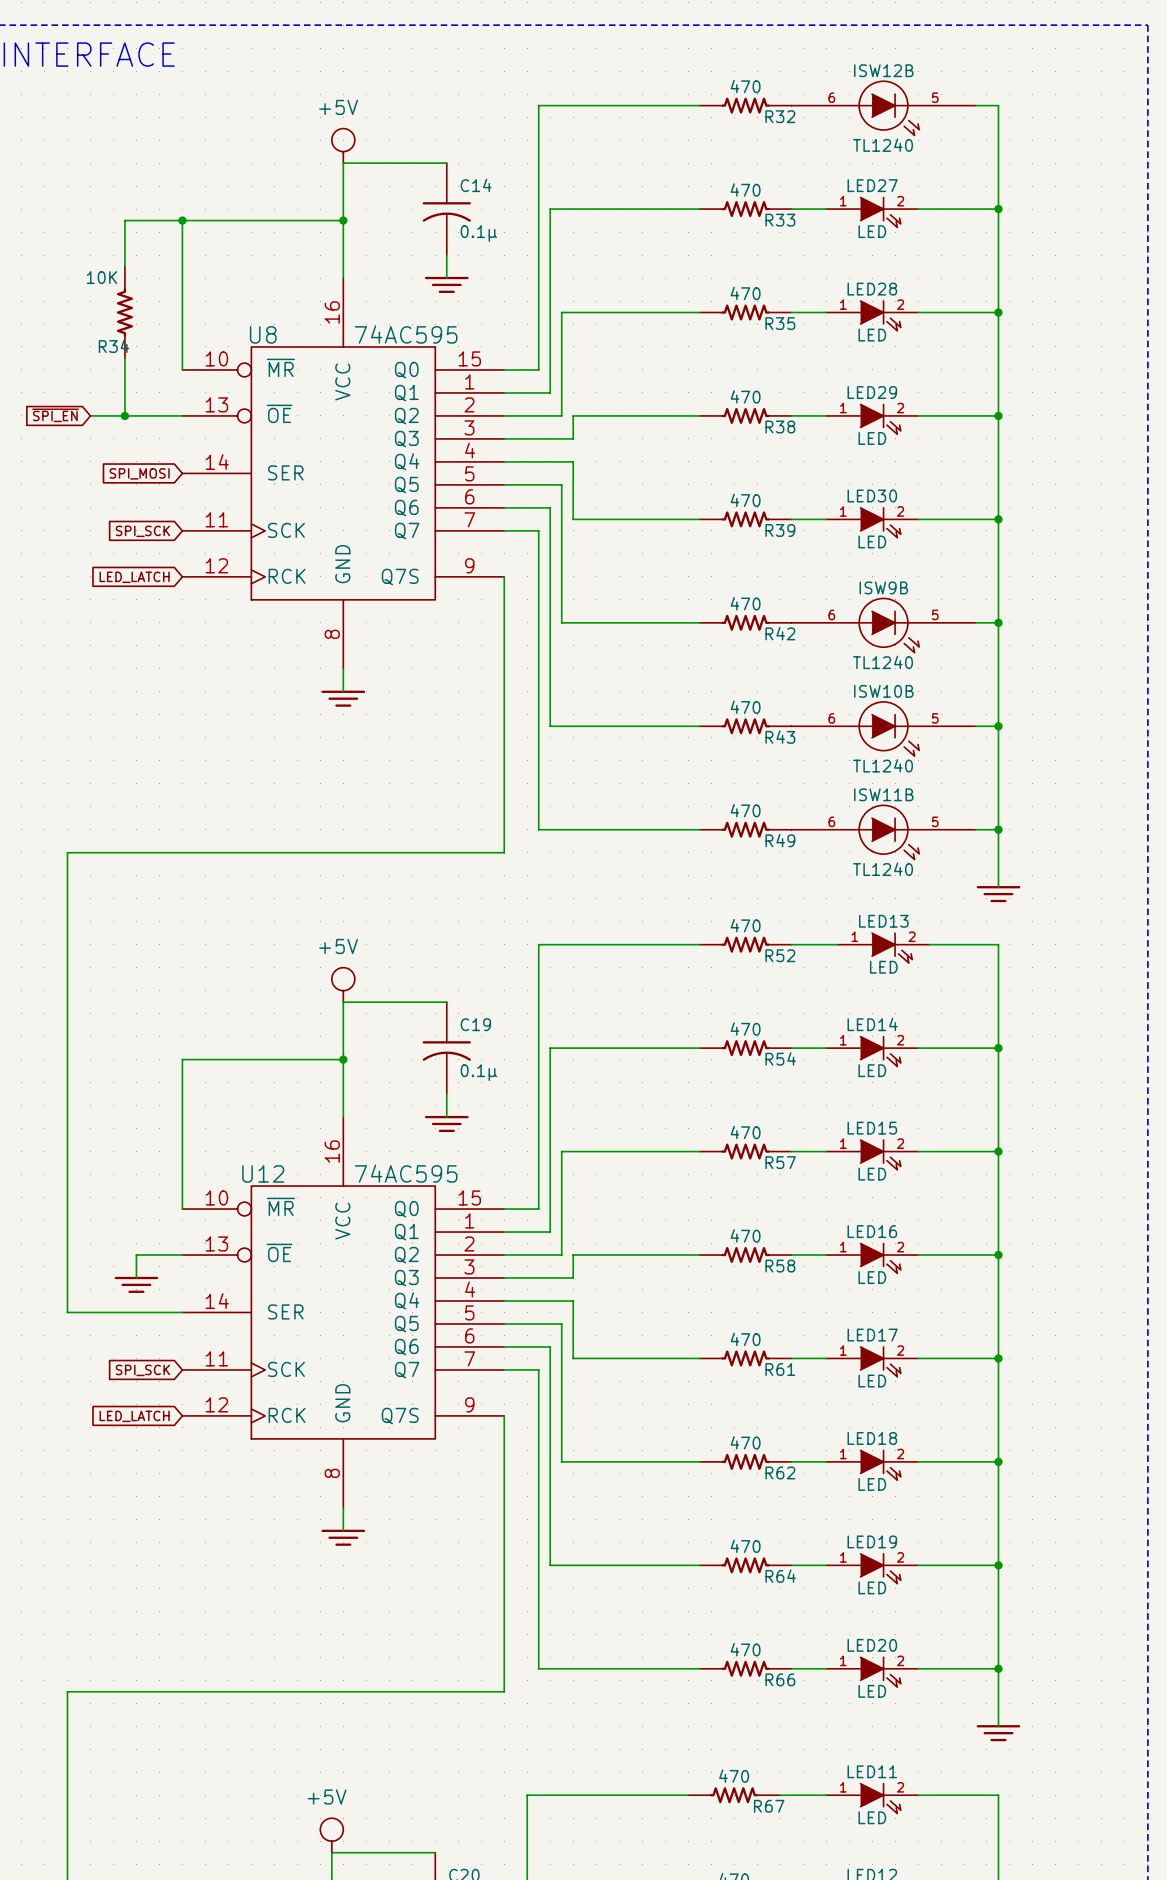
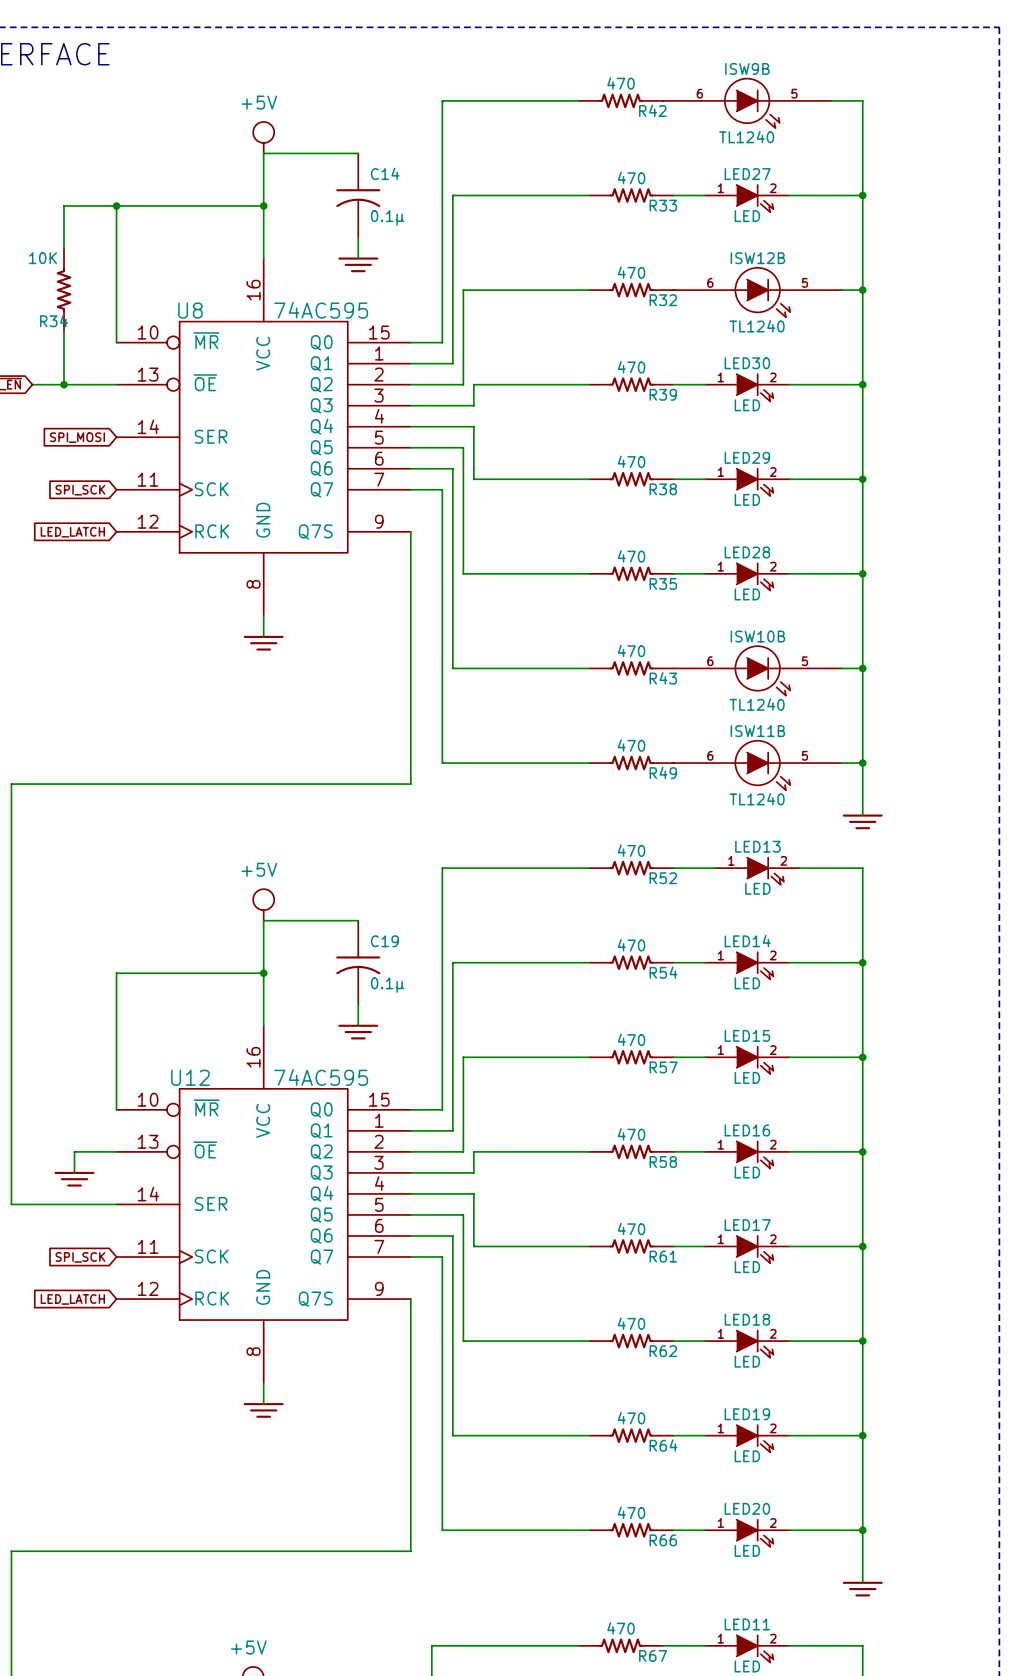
R42: none -> 470 (621, 100)
R32: 470 (745, 105) -> none
ISW12B position: (883, 108) -> (757, 292)
LED28 position: (872, 315) -> (747, 577)
R35 name: R35 (780, 323) -> R32 (663, 300)
LED29 name: LED29 (872, 392) -> LED30 (747, 363)
R38 name: R38 (780, 427) -> R39 (663, 394)
LED30 name: LED30 (872, 495) -> LED29 (747, 457)
R39 name: R39 (780, 530) -> R38 (663, 489)
ISW9B position: (883, 625) -> (747, 103)
R42 name: R42 (780, 633) -> R35 (663, 583)

